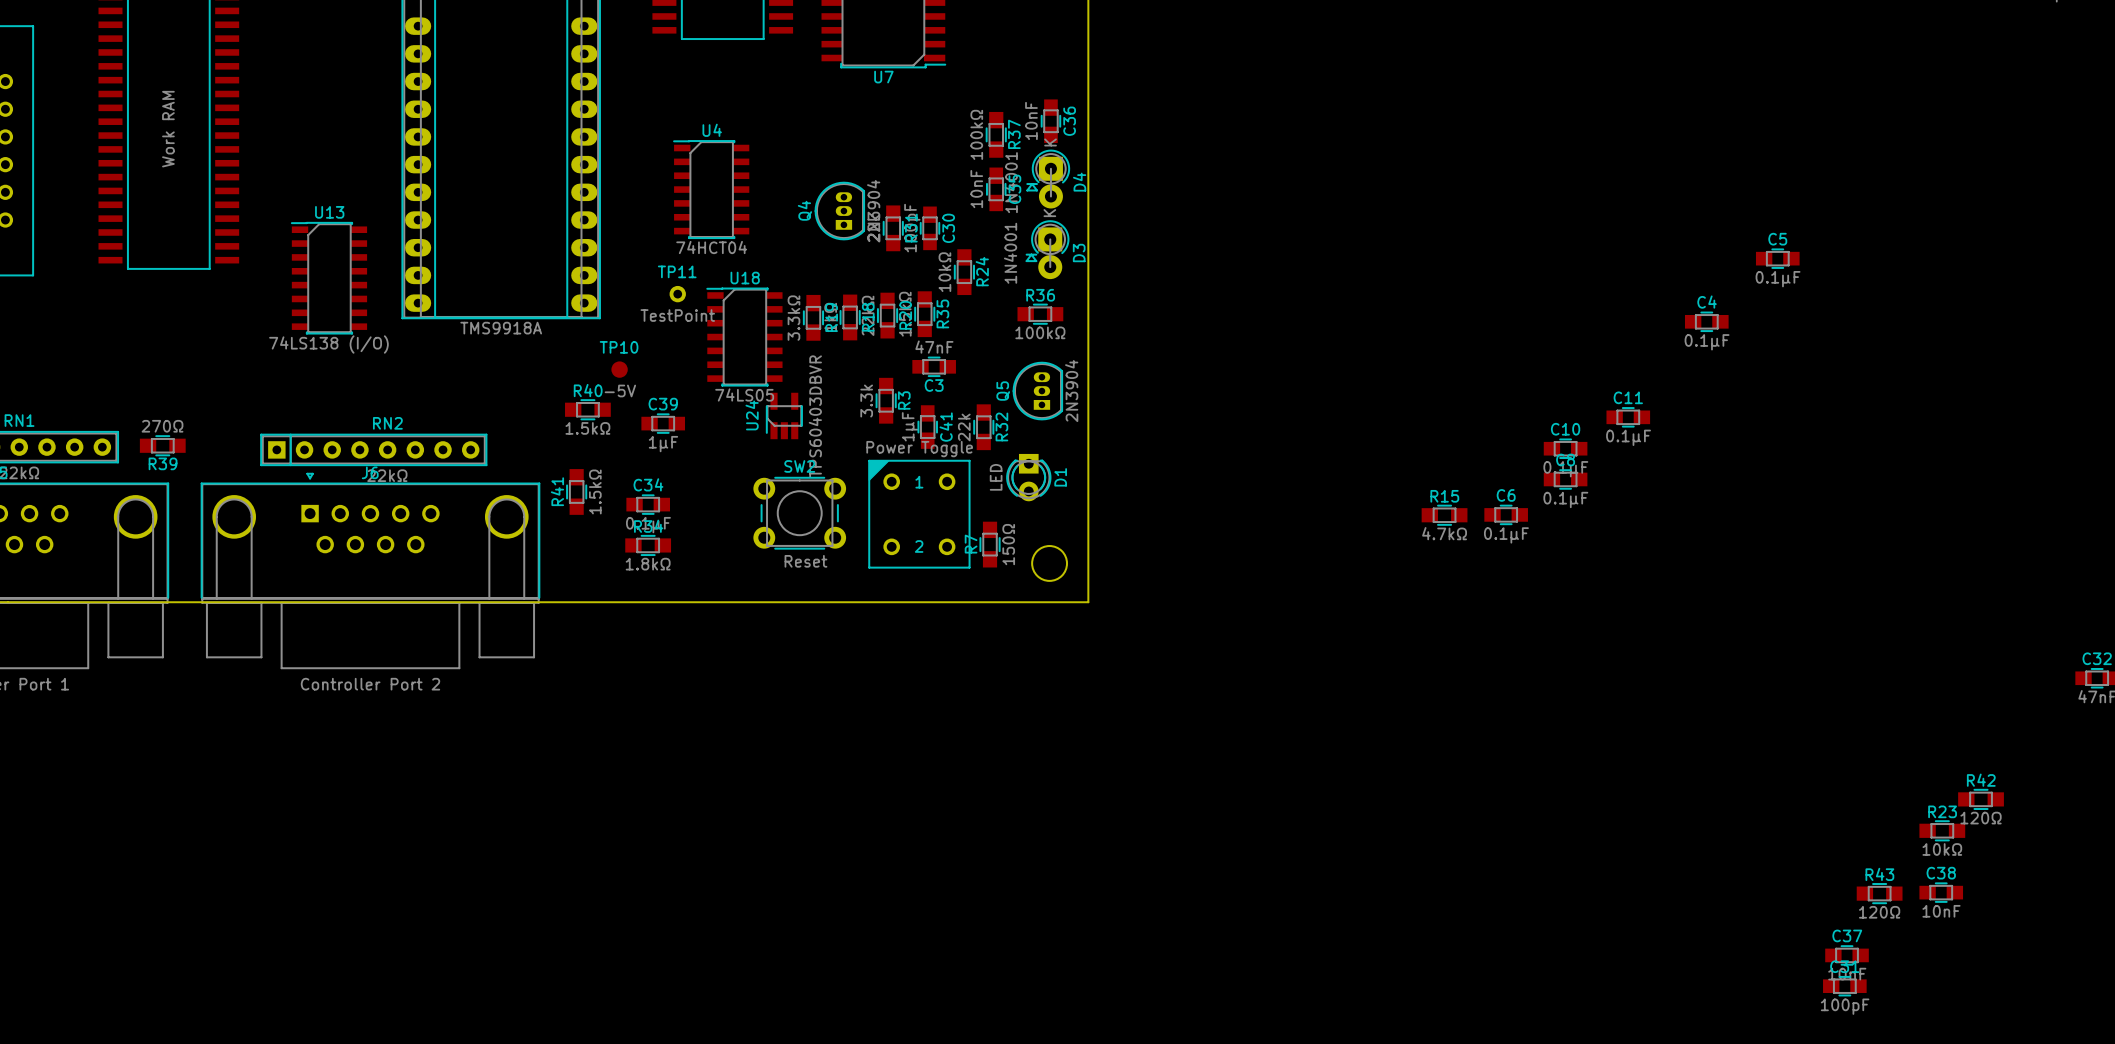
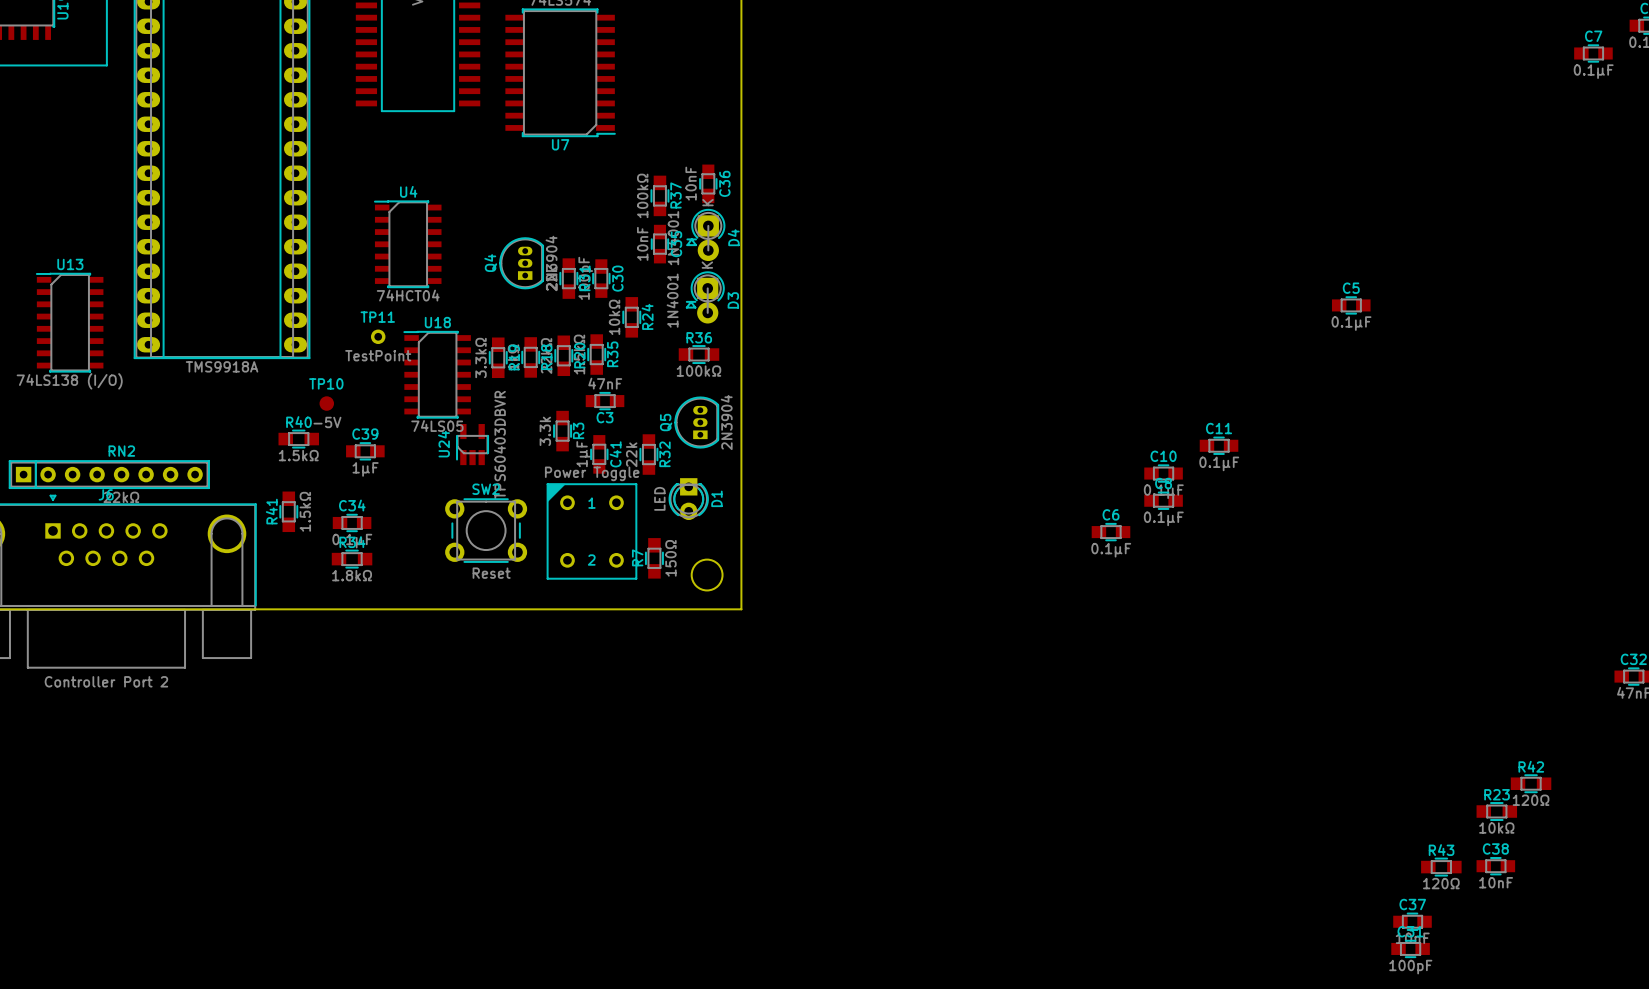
C4: 0.1µF (1706, 321) -> none
R15: 4.7kΩ (1444, 515) -> none

